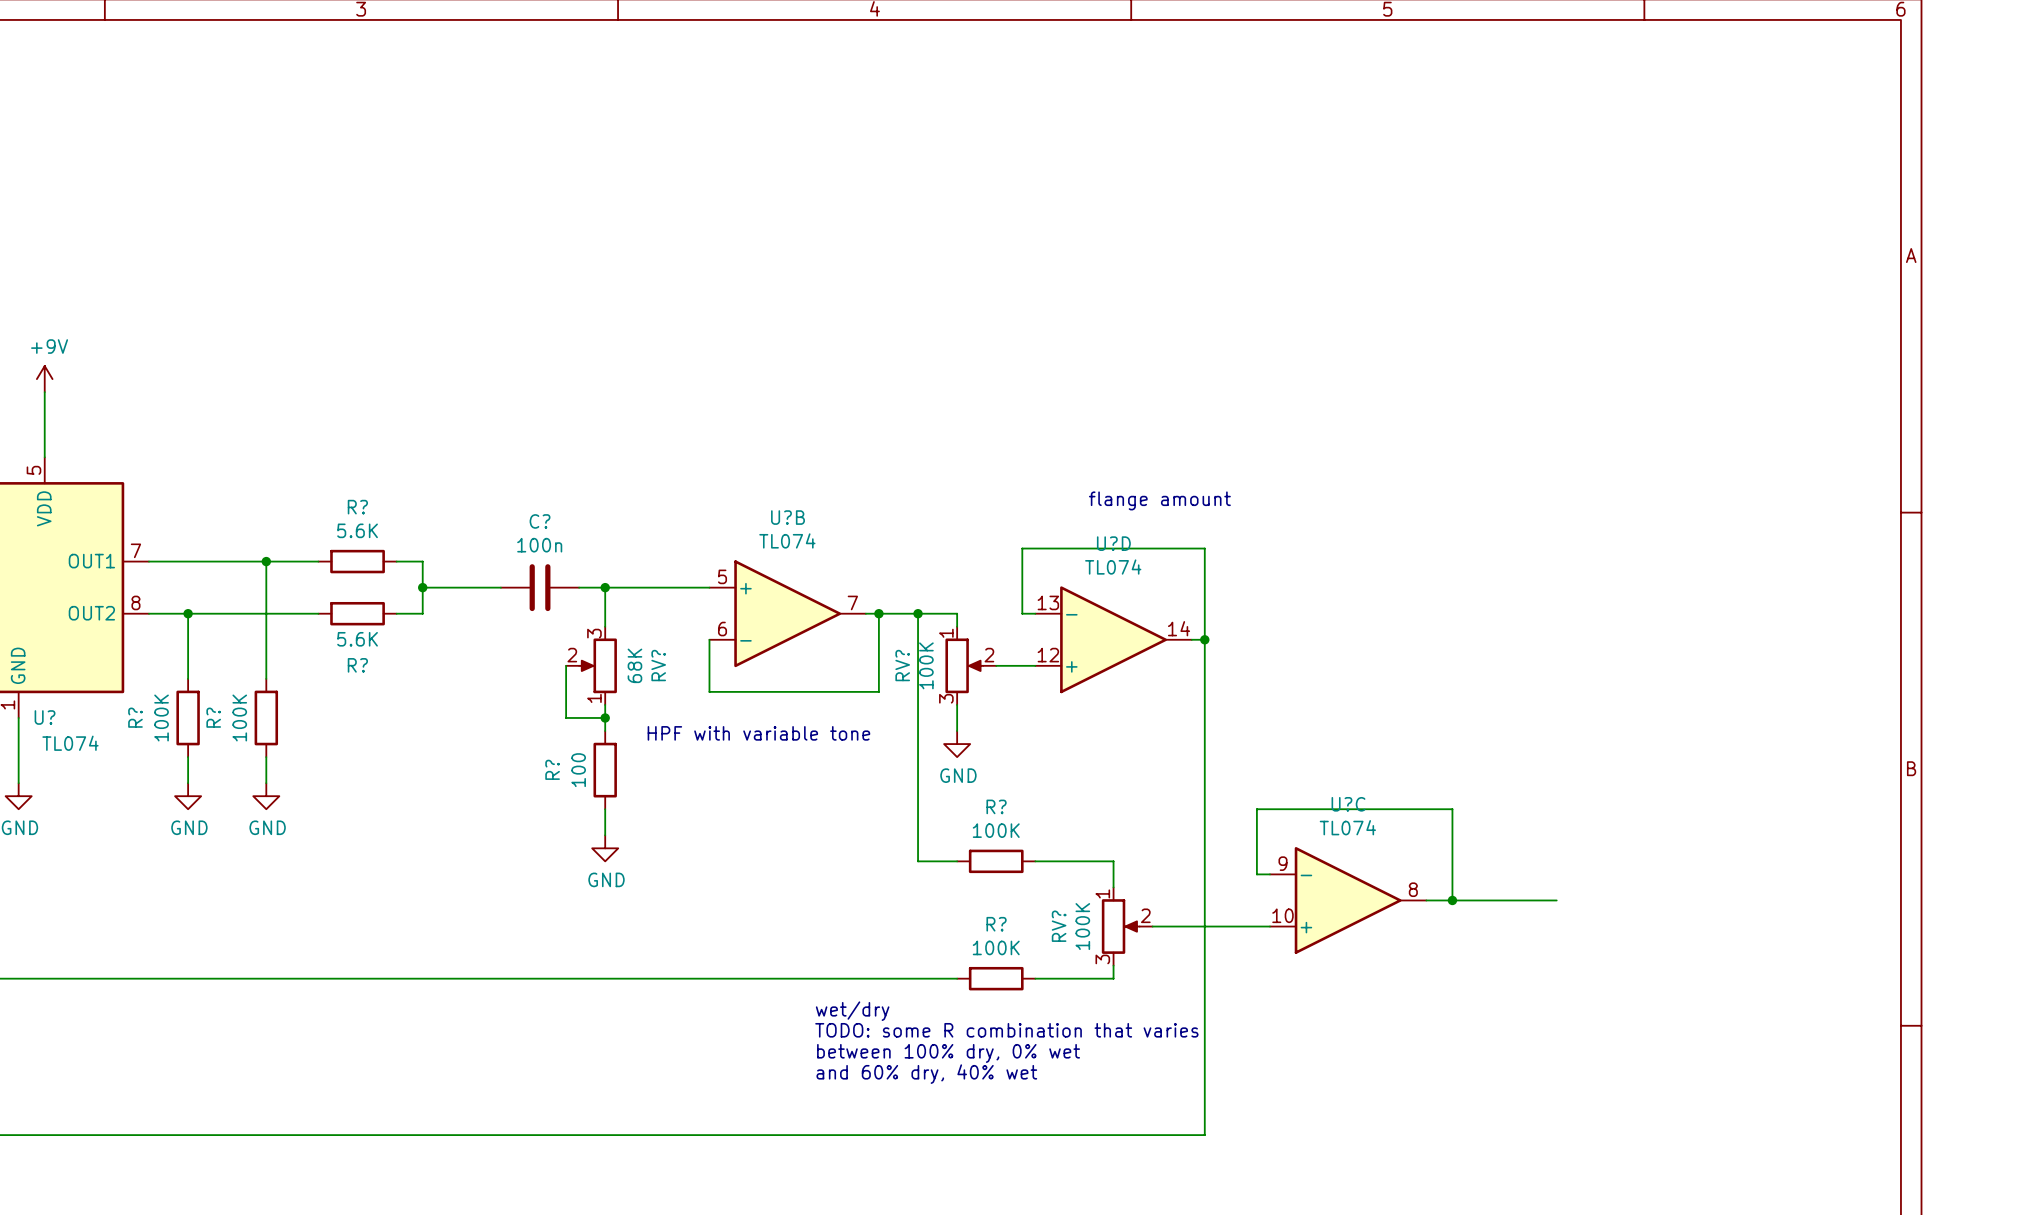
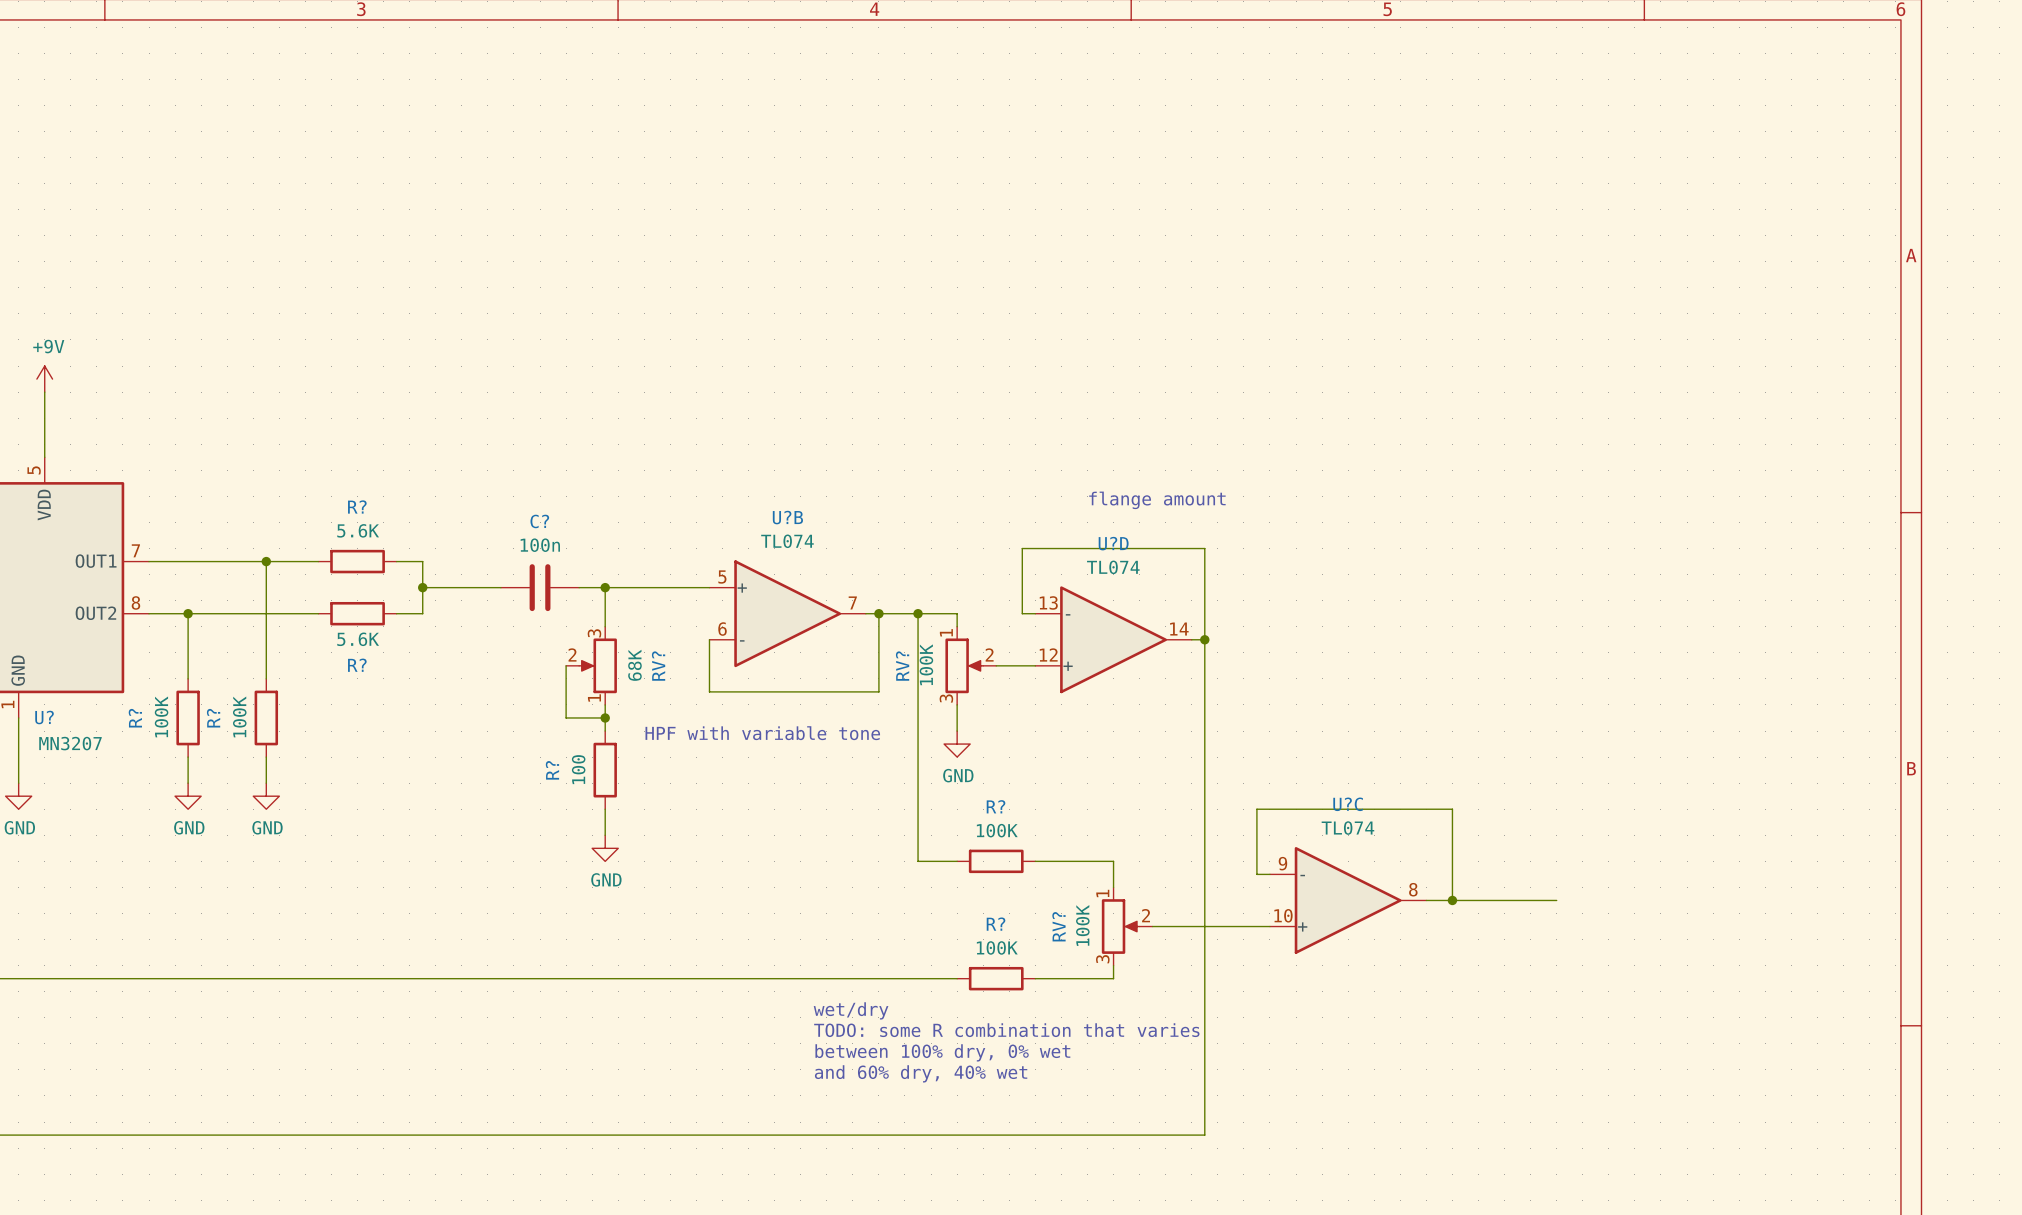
U? value: TL074 (70, 743) -> MN3207 (70, 743)

